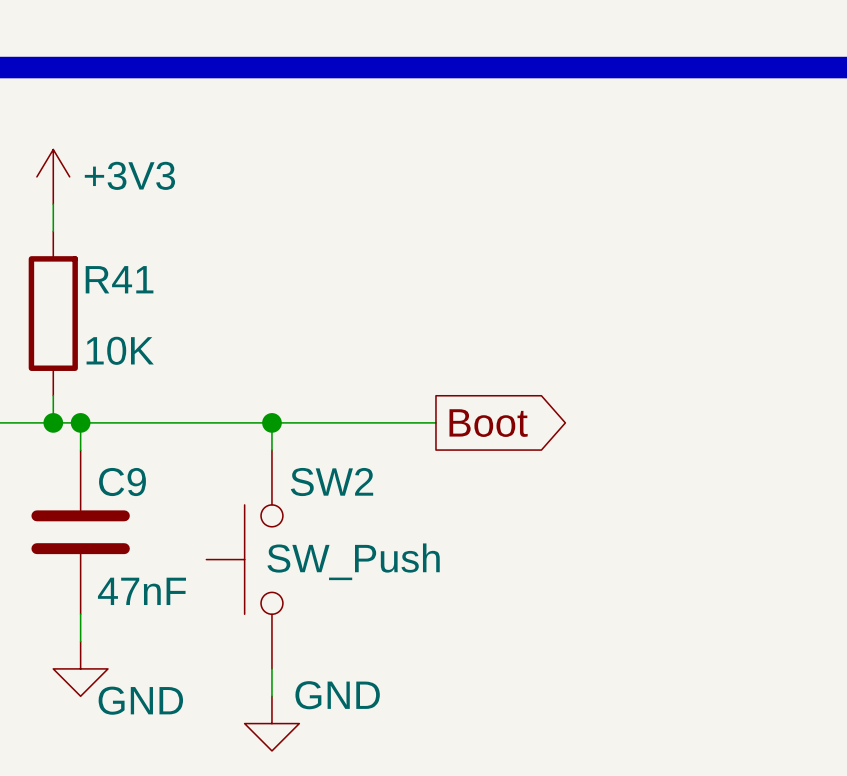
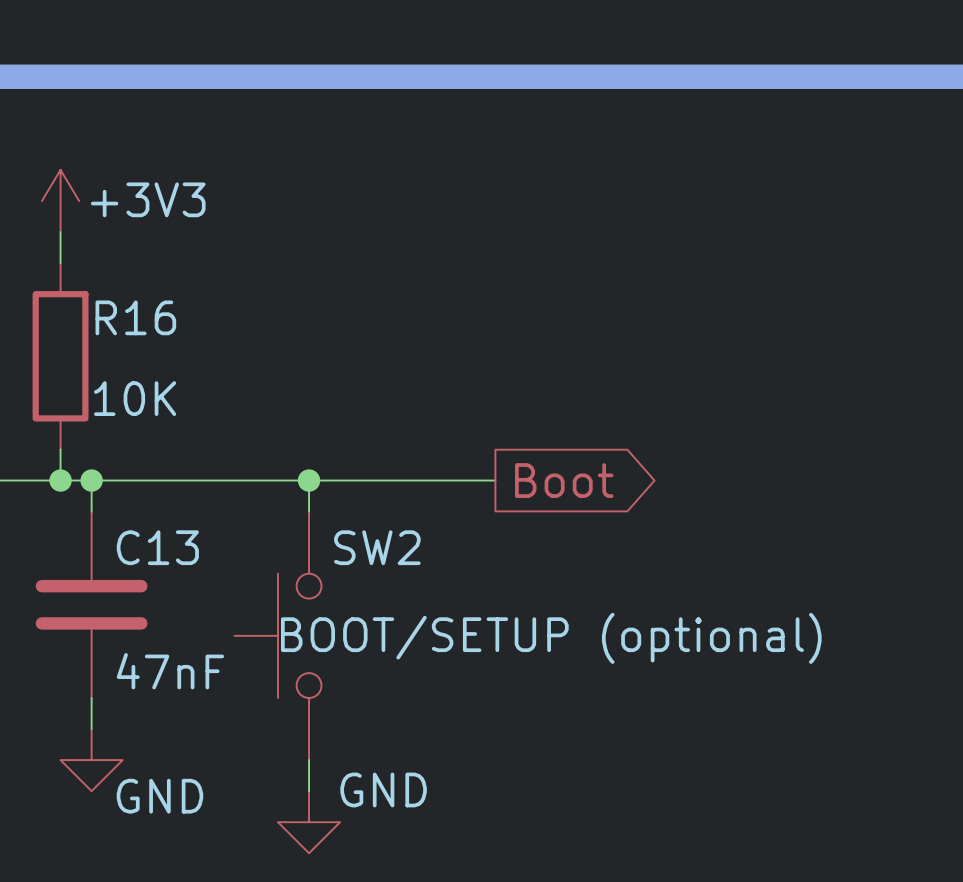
R41 name: R41 (119, 279) -> R16 (135, 317)
C9 name: C9 (122, 482) -> C13 (157, 547)
SW2 value: SW_Push (353, 561) -> BOOT/SETUP (optional) (551, 638)

